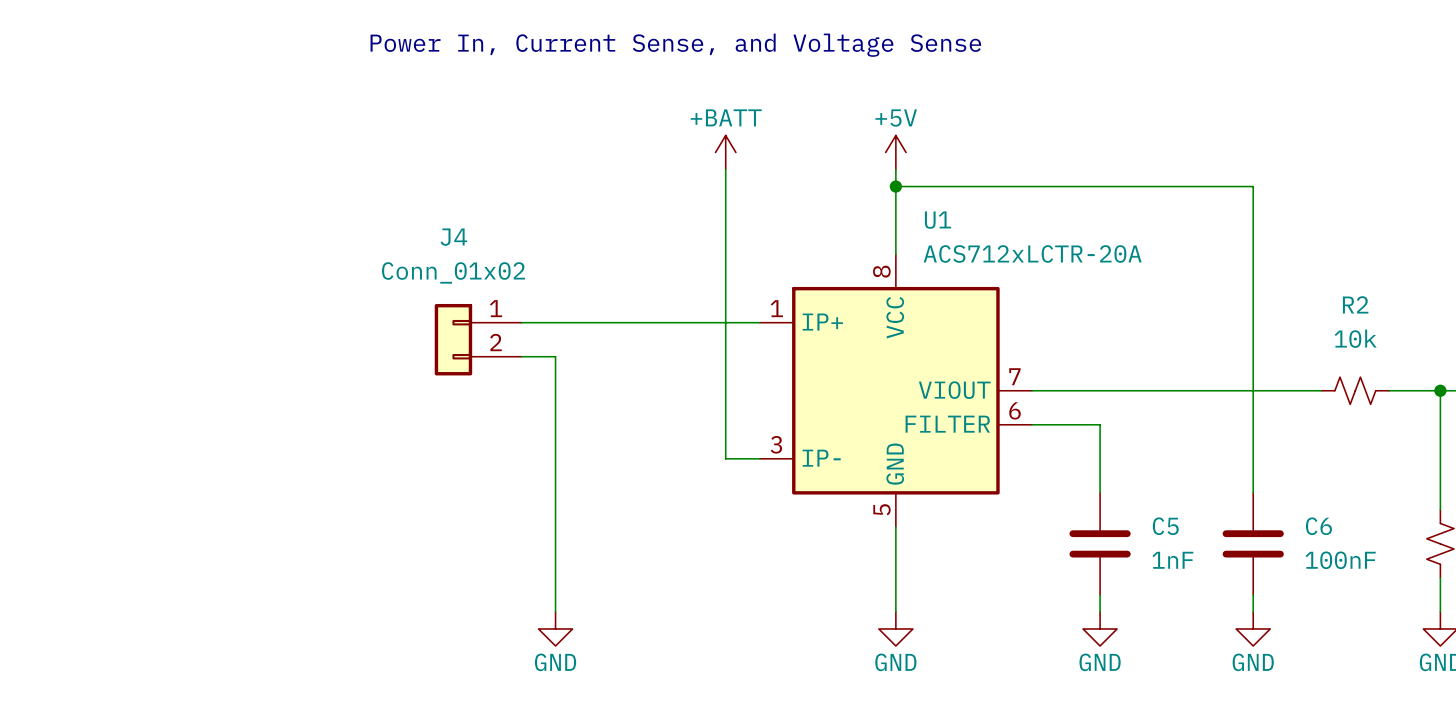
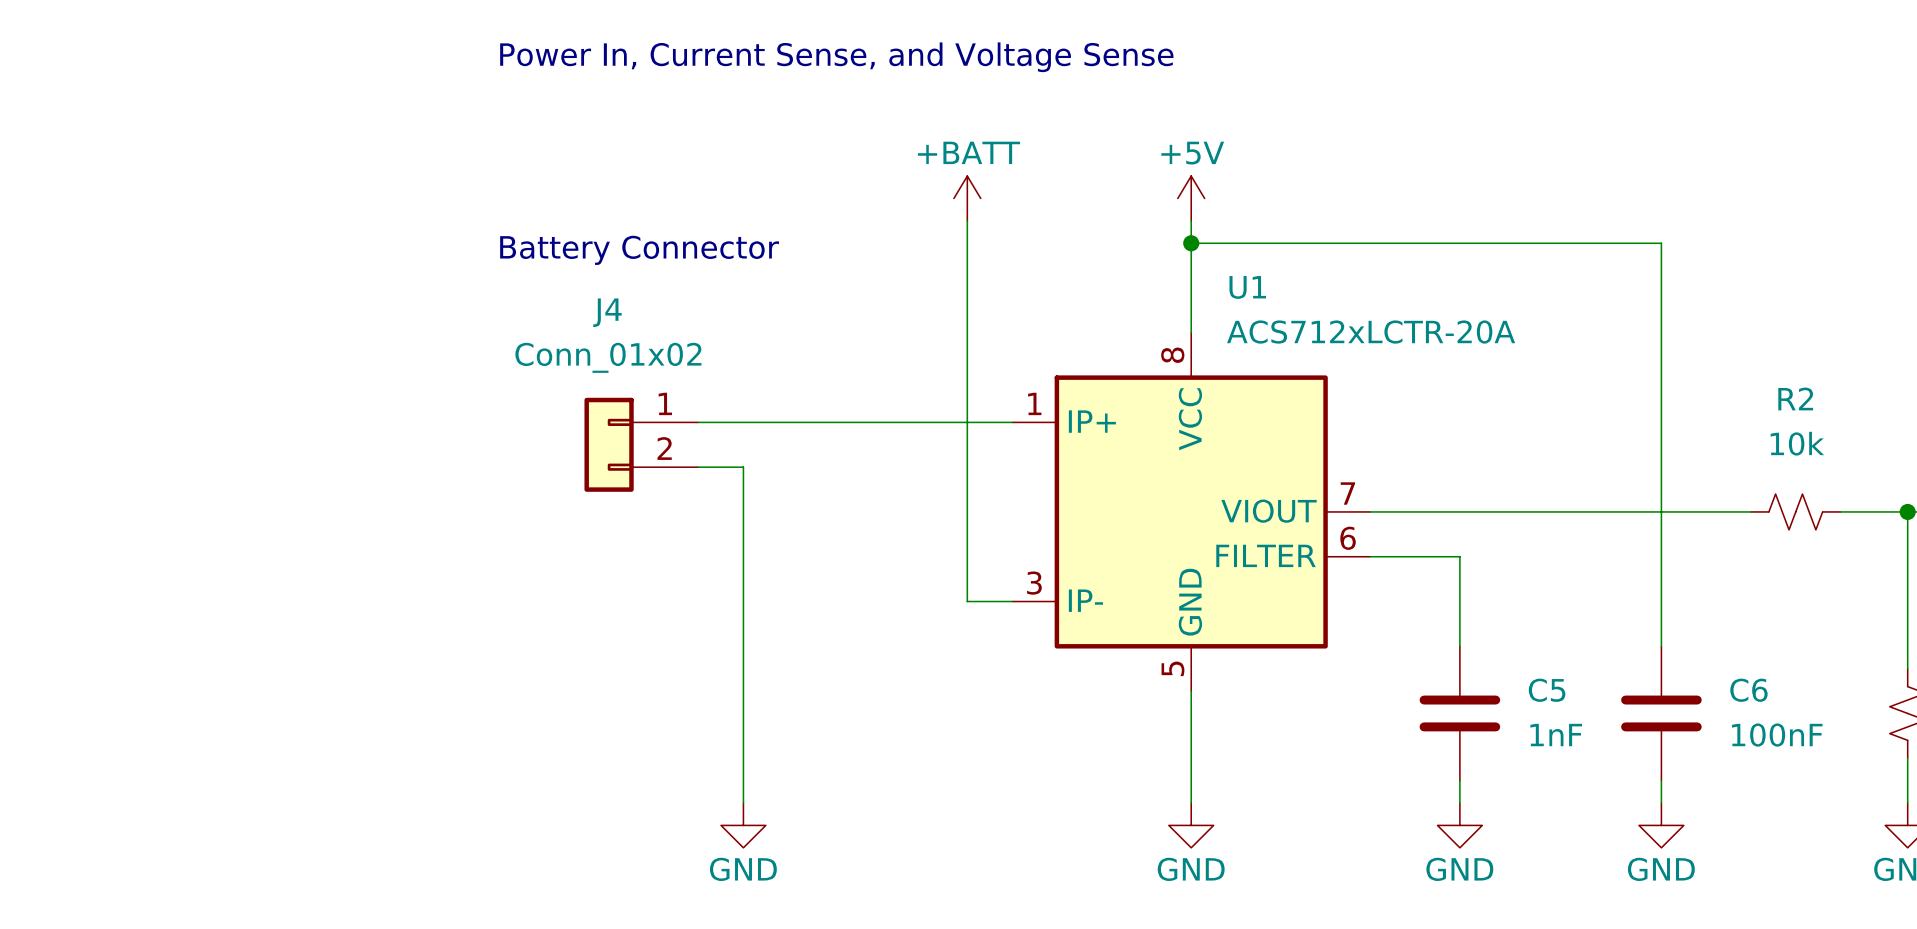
text: none -> Battery Connector (639, 250)

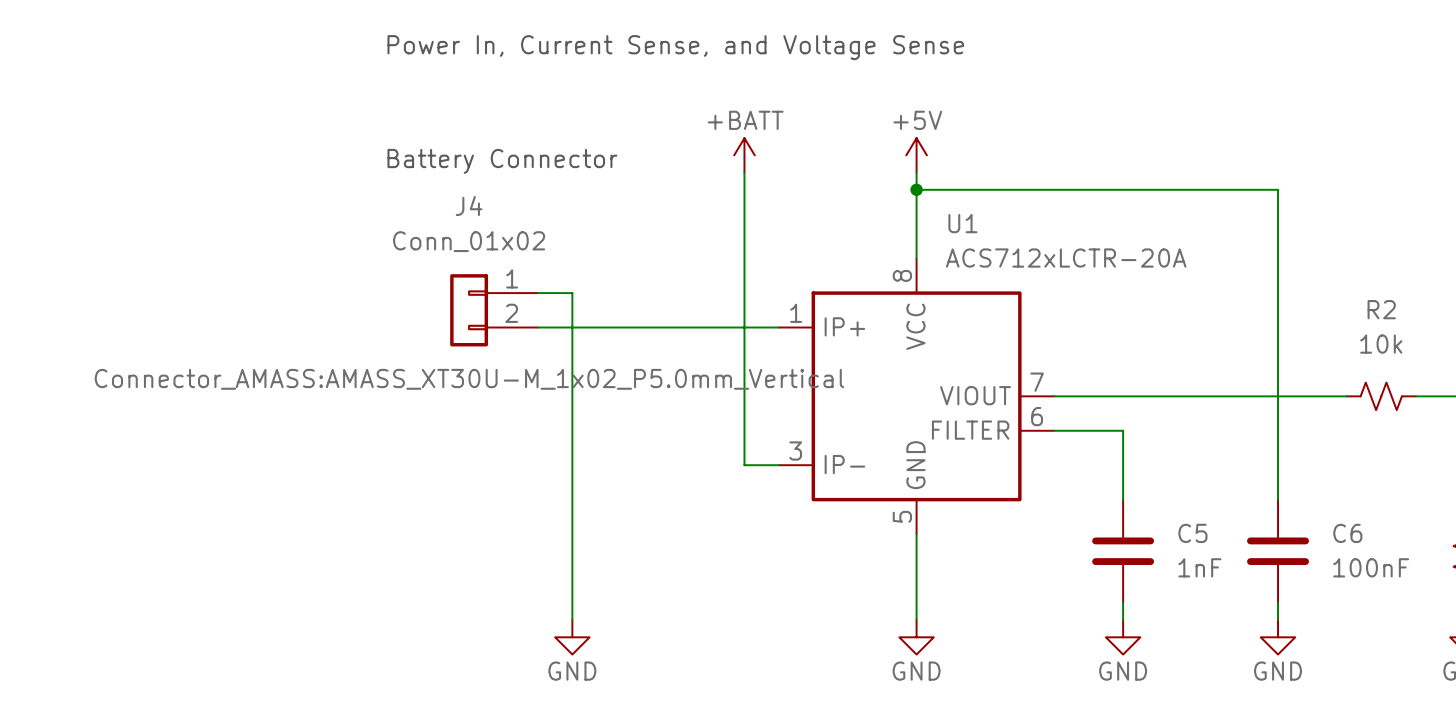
text position: Battery Connector (639, 250) -> Battery Connector (502, 161)
J4 position: (641, 444) -> (494, 310)
wire: (698, 467) (743, 467) -> (537, 293) (572, 293) (572, 361)
J4 text: none -> Connector_AMASS:AMASS_XT30U-M_1x02_P5.0mm_Vertical (469, 379)

